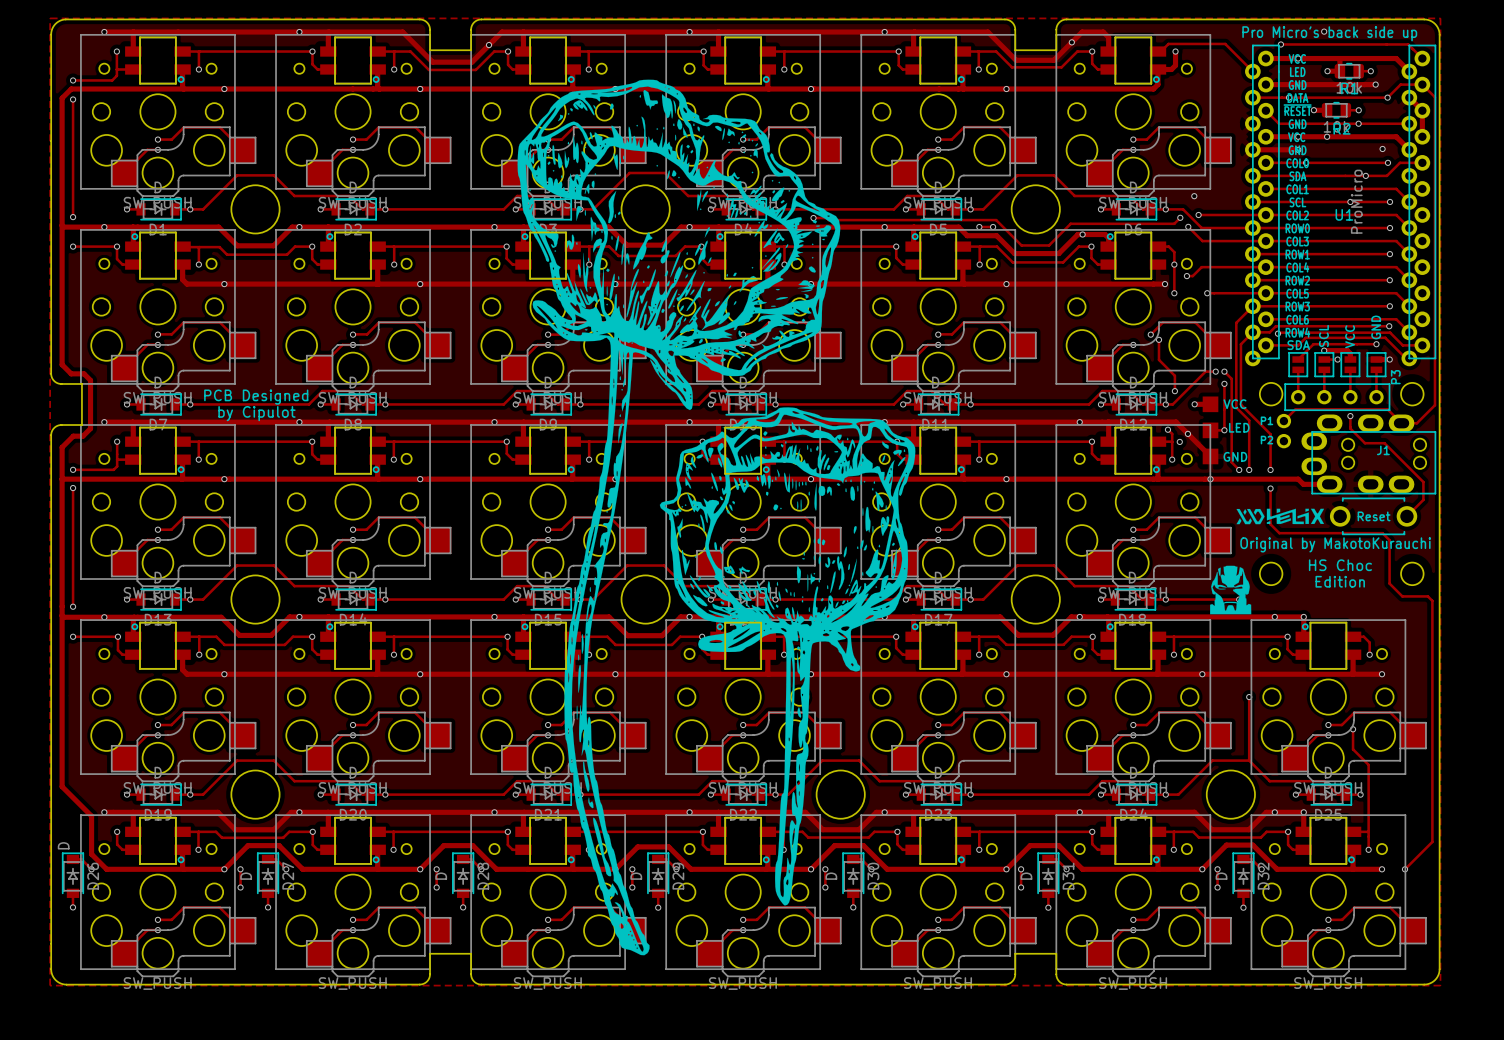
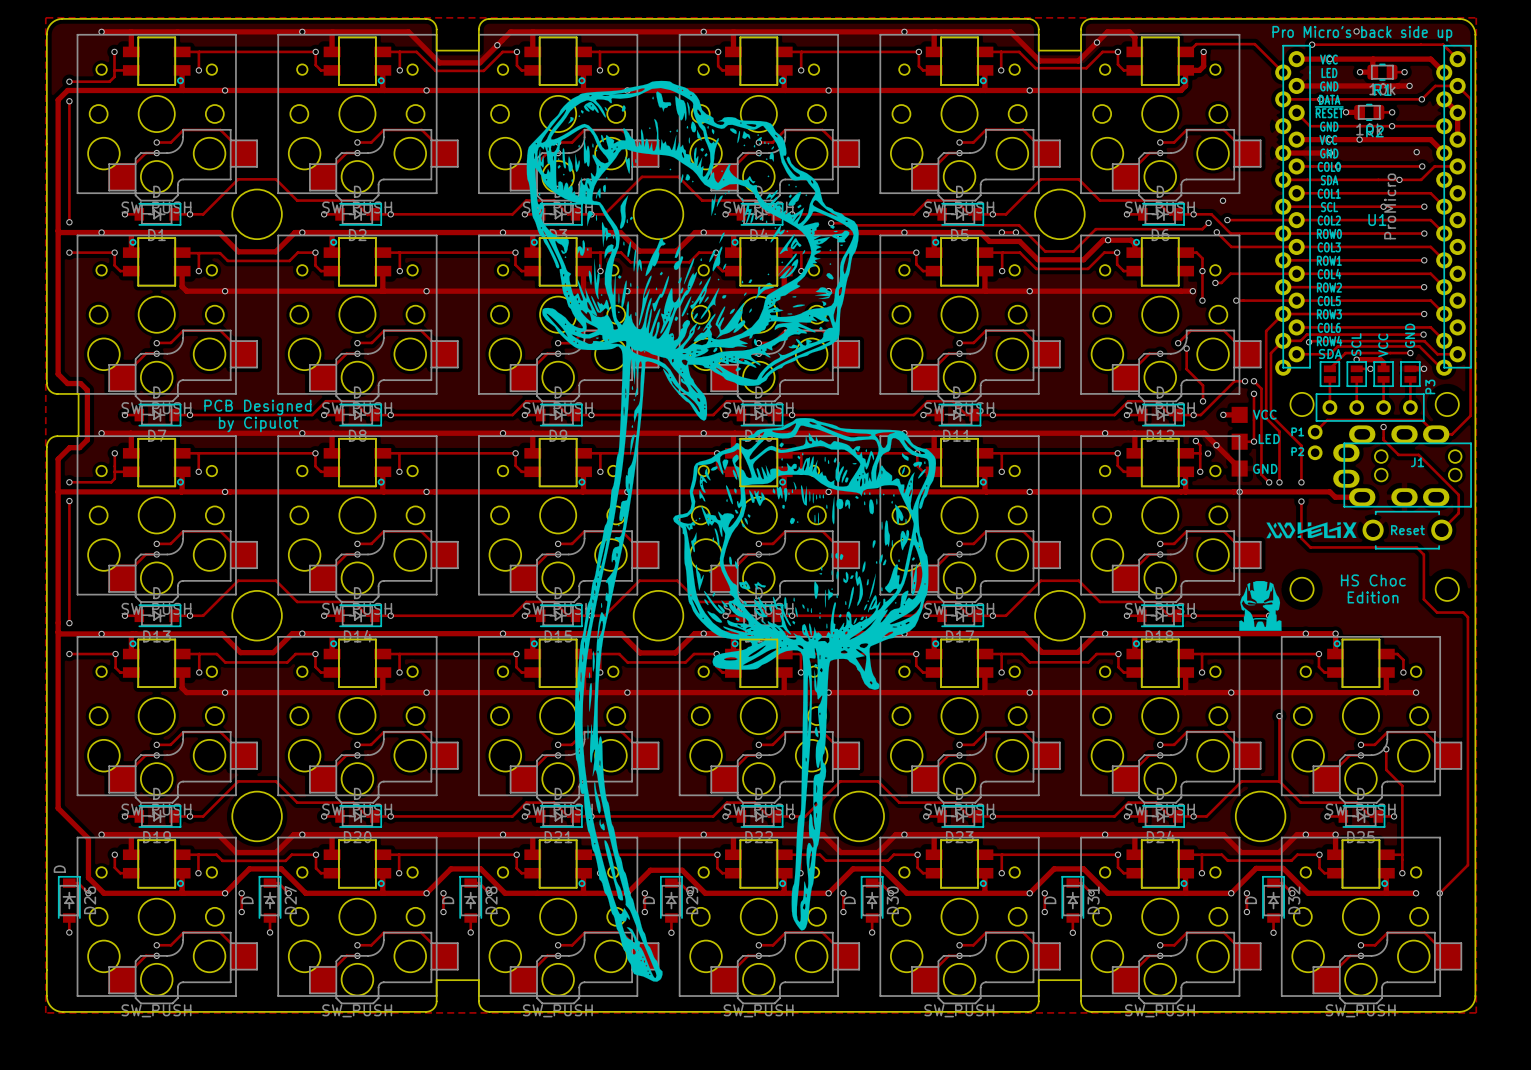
text: Original by MakotoKurauchi (1335, 544) -> none

